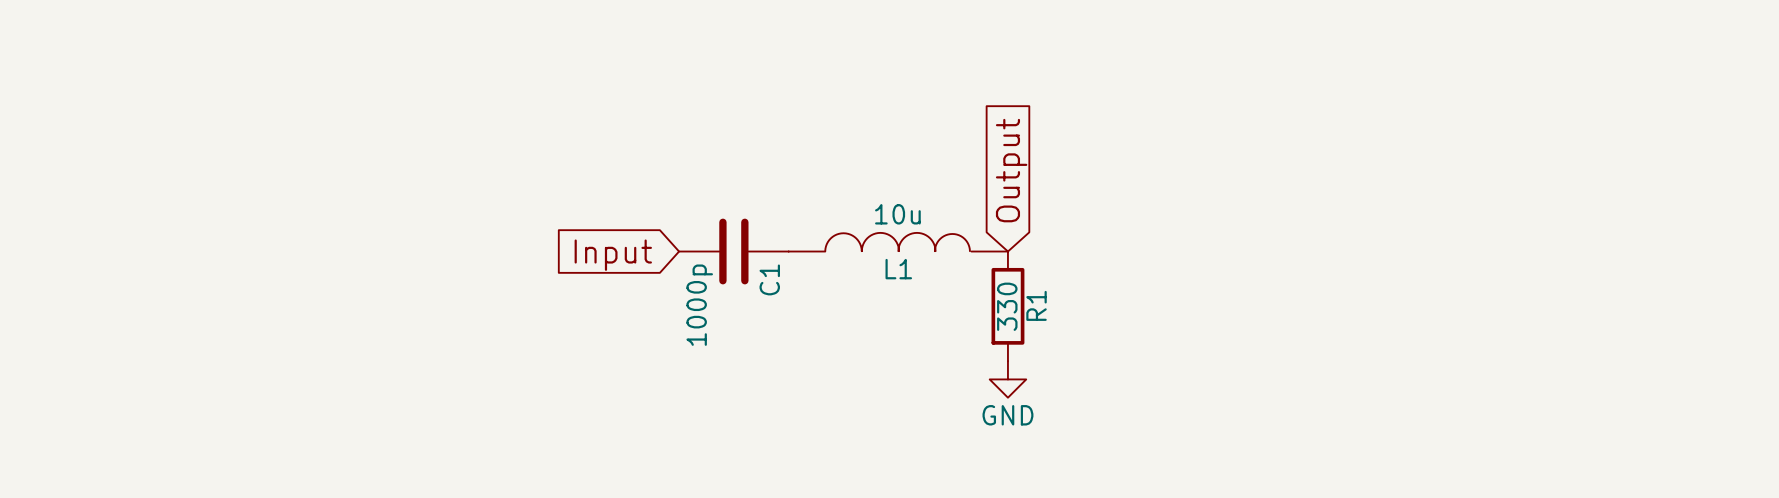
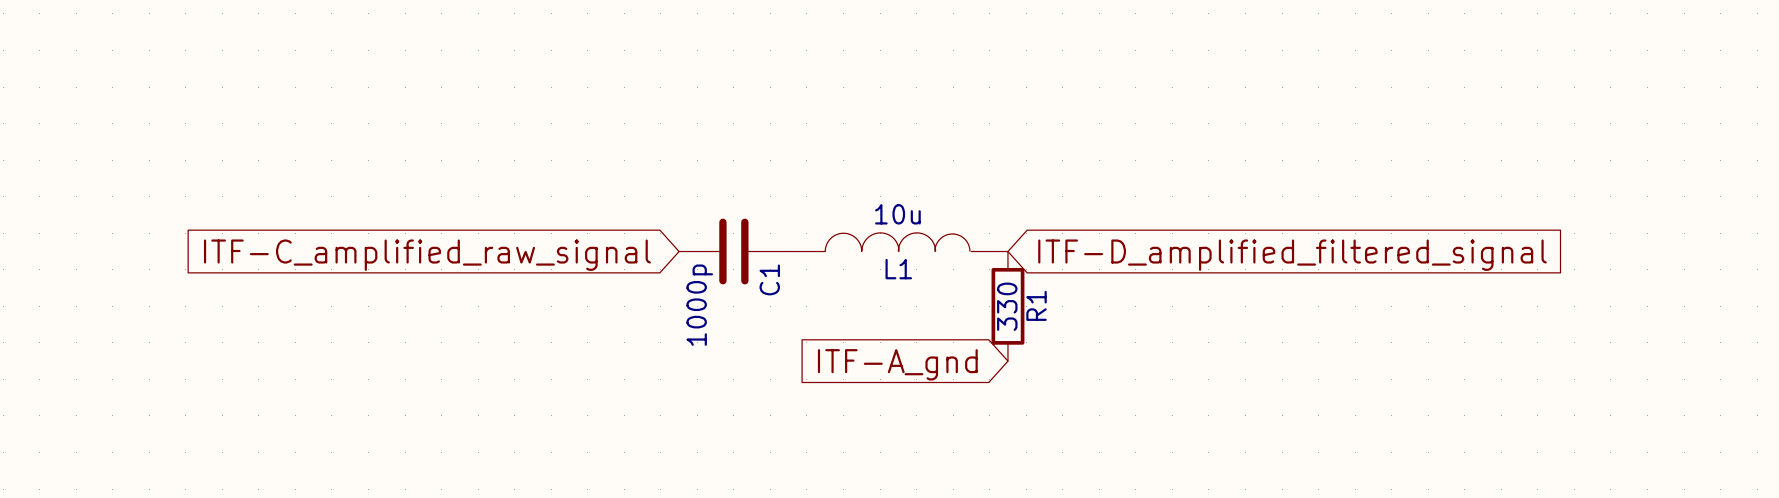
global label: Output (1011, 170) -> ITF-D_amplified_filtered_signal (1292, 255)
global label: Input (613, 255) -> ITF-C_amplified_raw_signal (427, 255)
global label: none -> ITF-A_gnd (897, 364)
power symbol: GND (1007, 379) -> none

